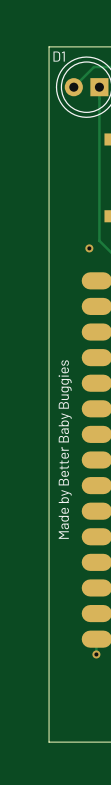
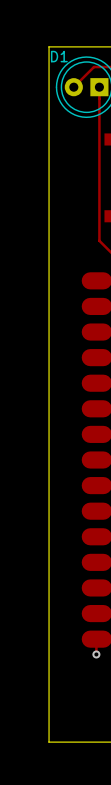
via: (89, 248) -> none
text: Made by Better Baby Buggies (65, 449) -> none

